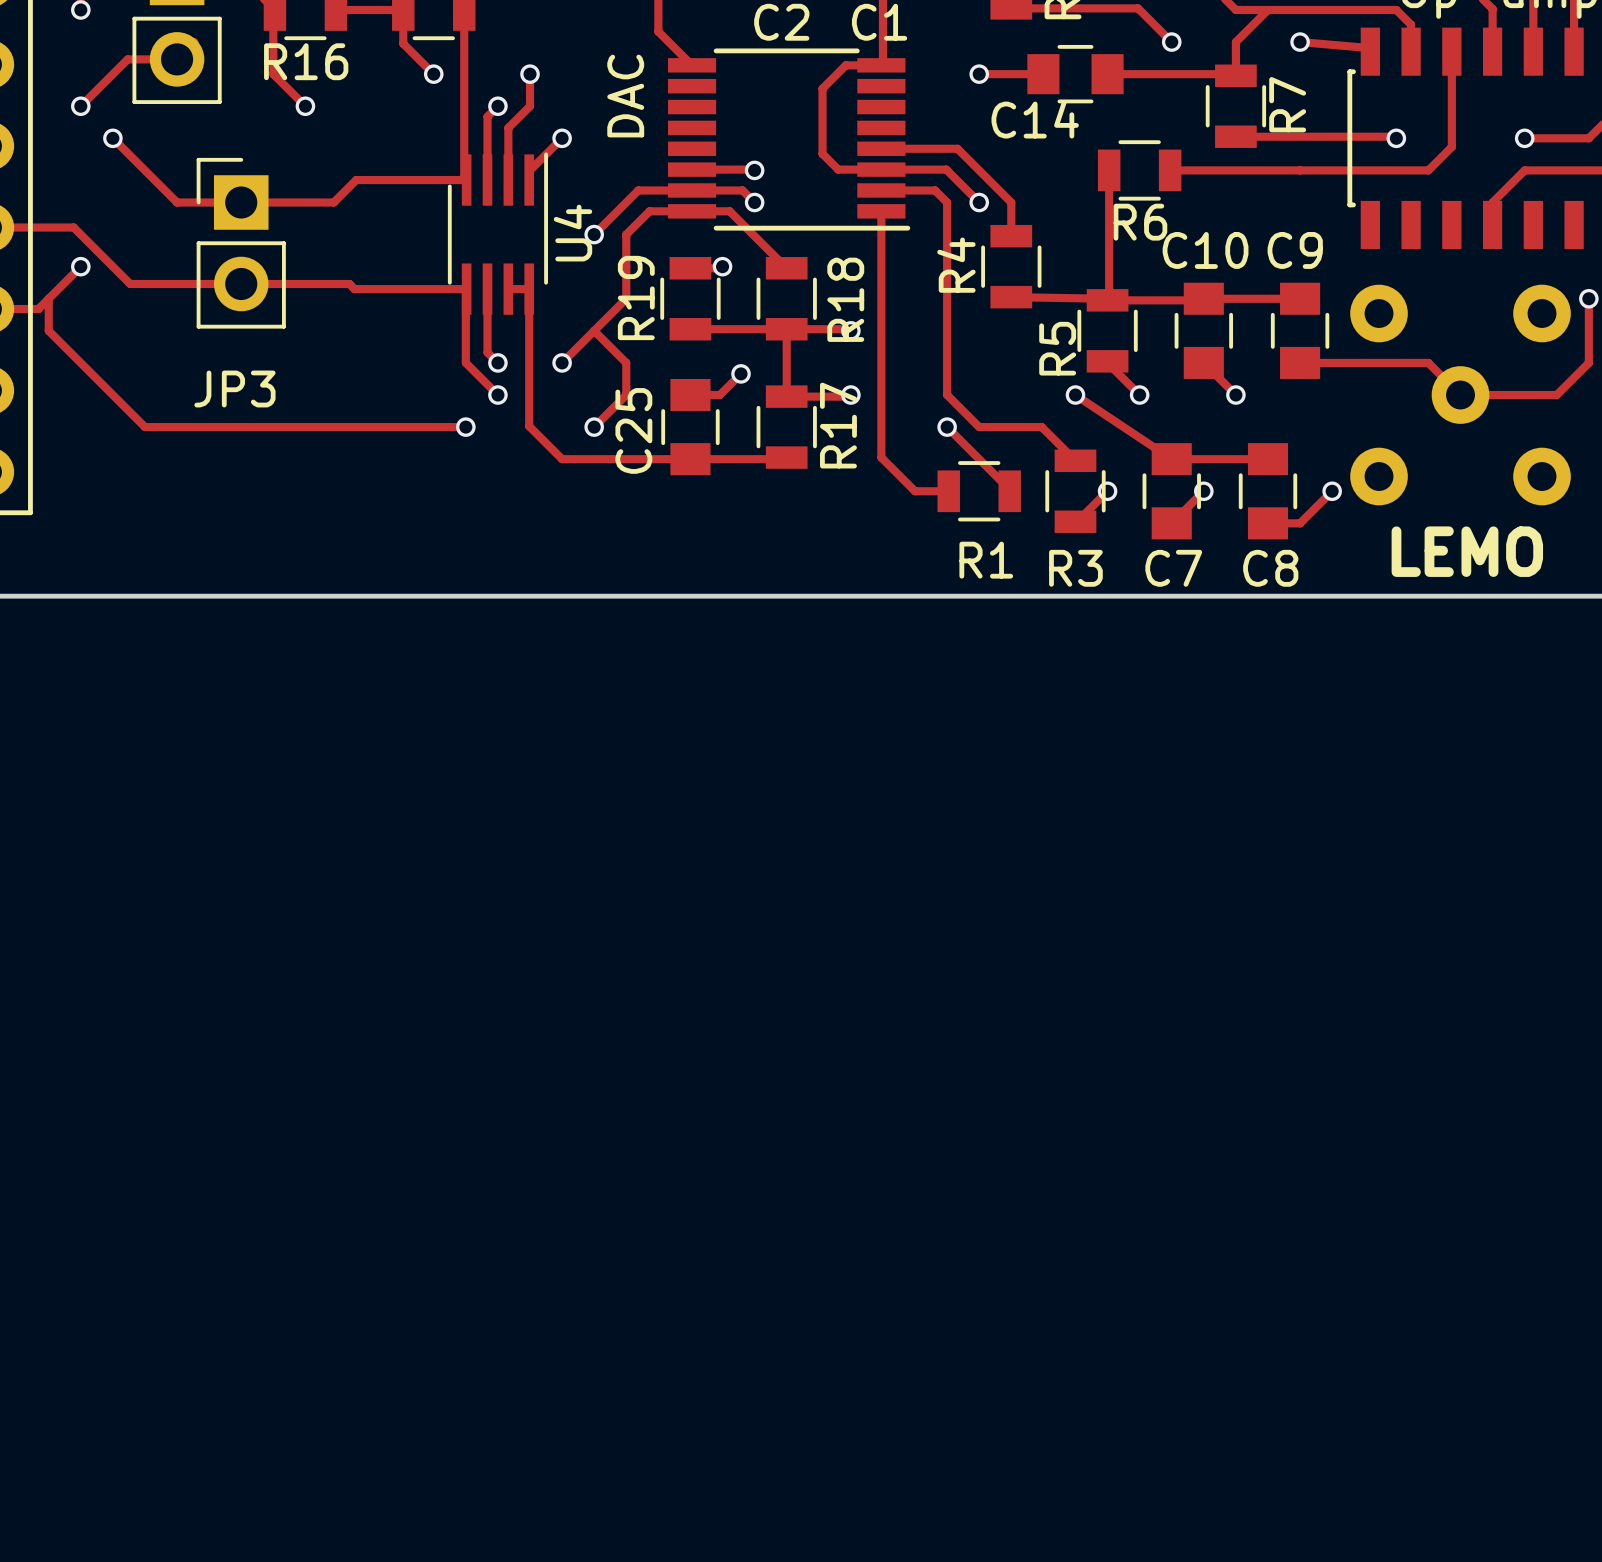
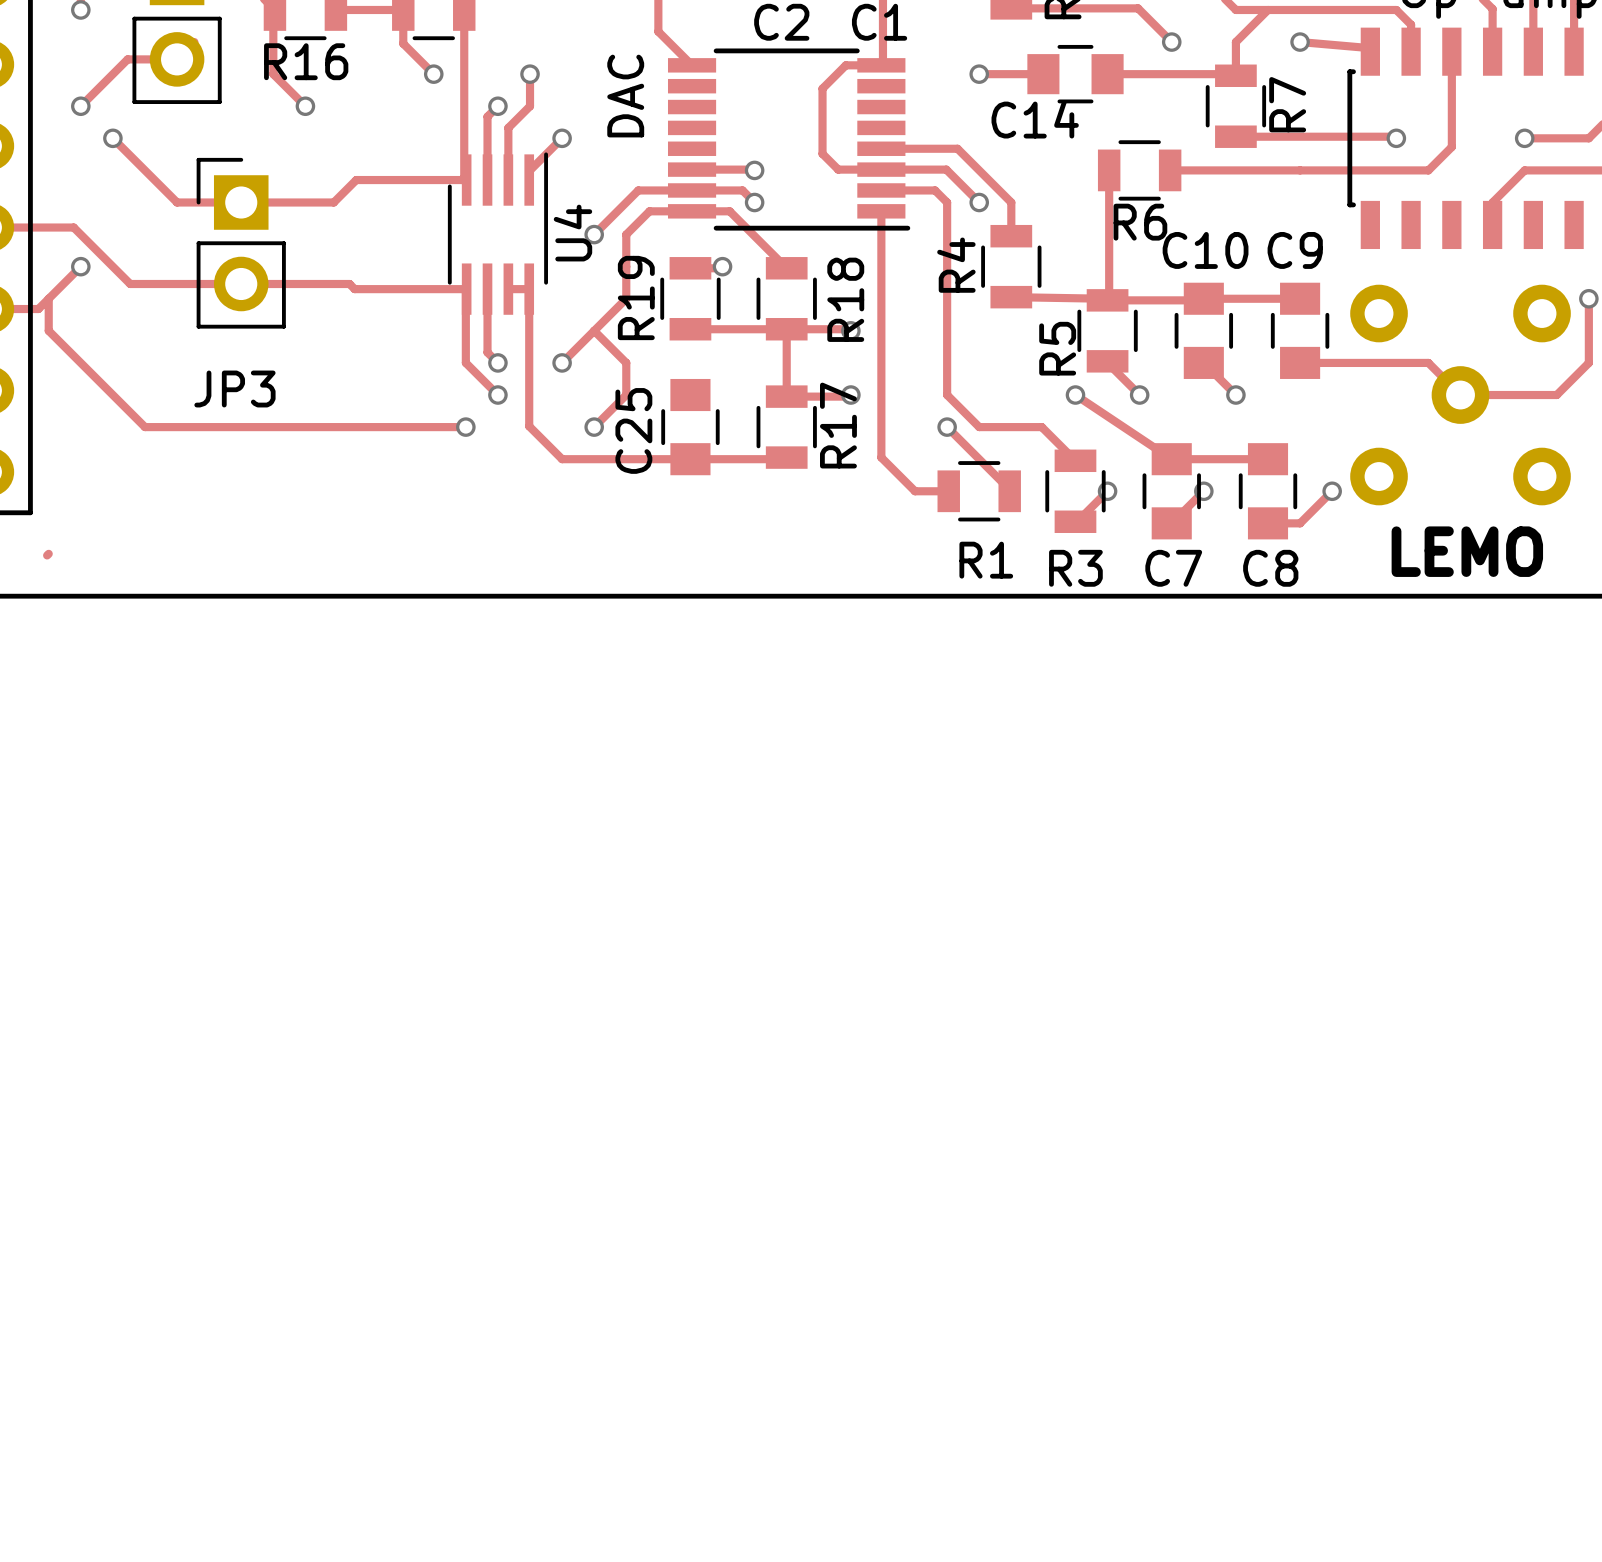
track: (741, 373) (719, 395) (690, 395) -> none
via: (741, 373) -> none
track: none -> (48, 553) (47, 555)

